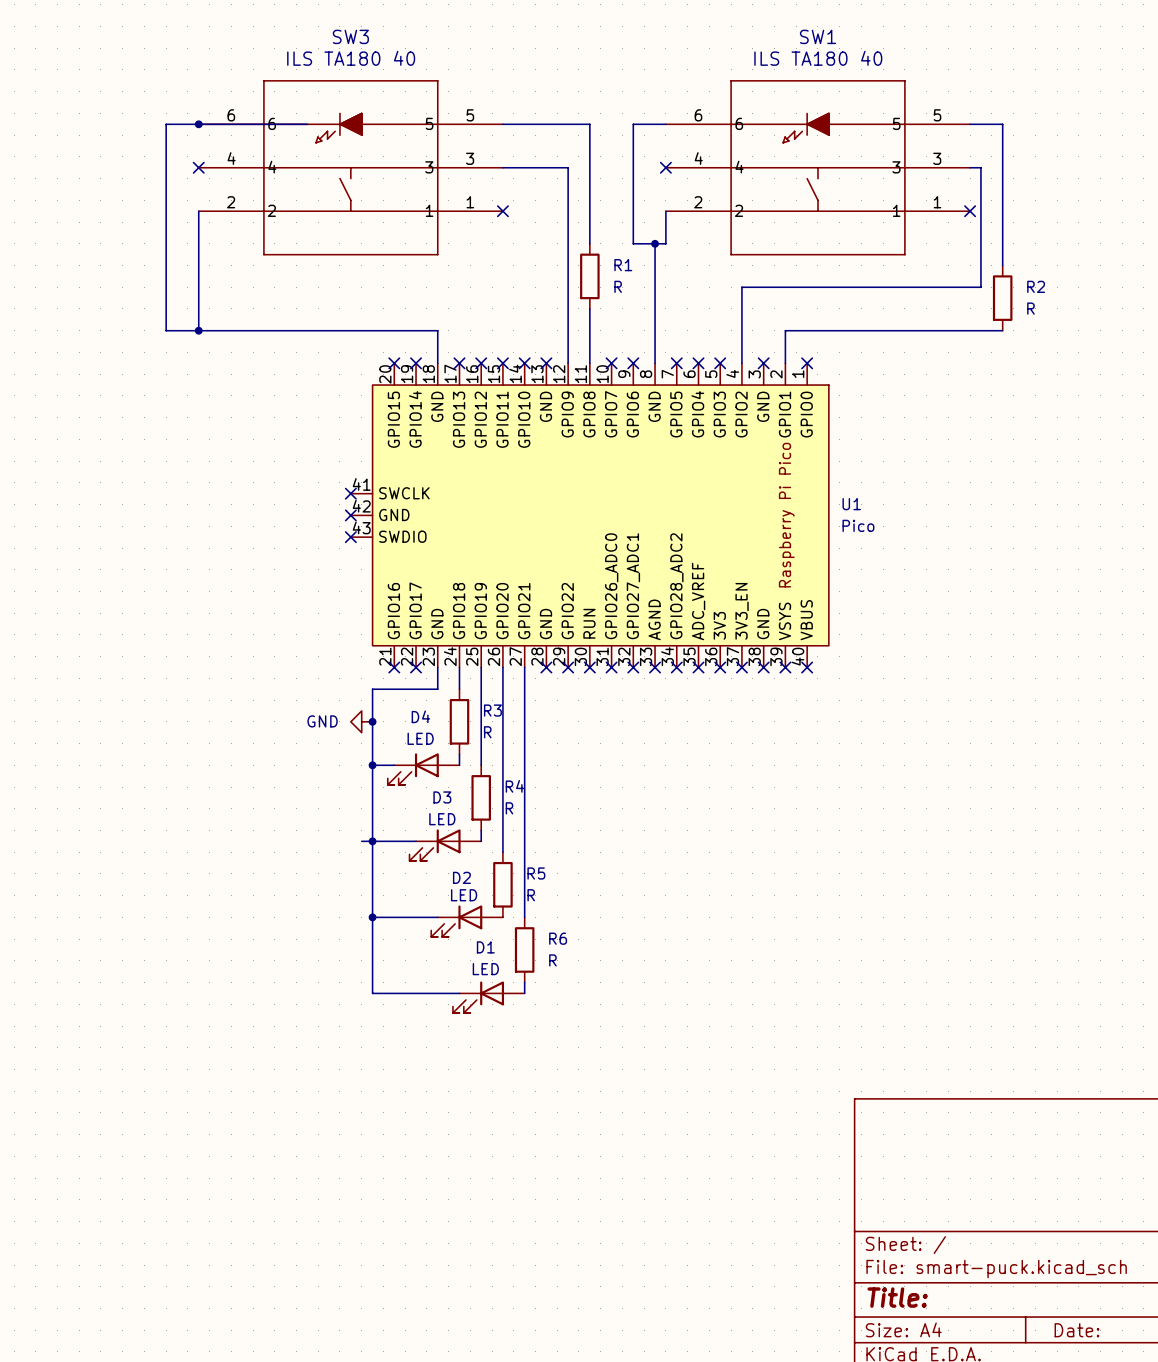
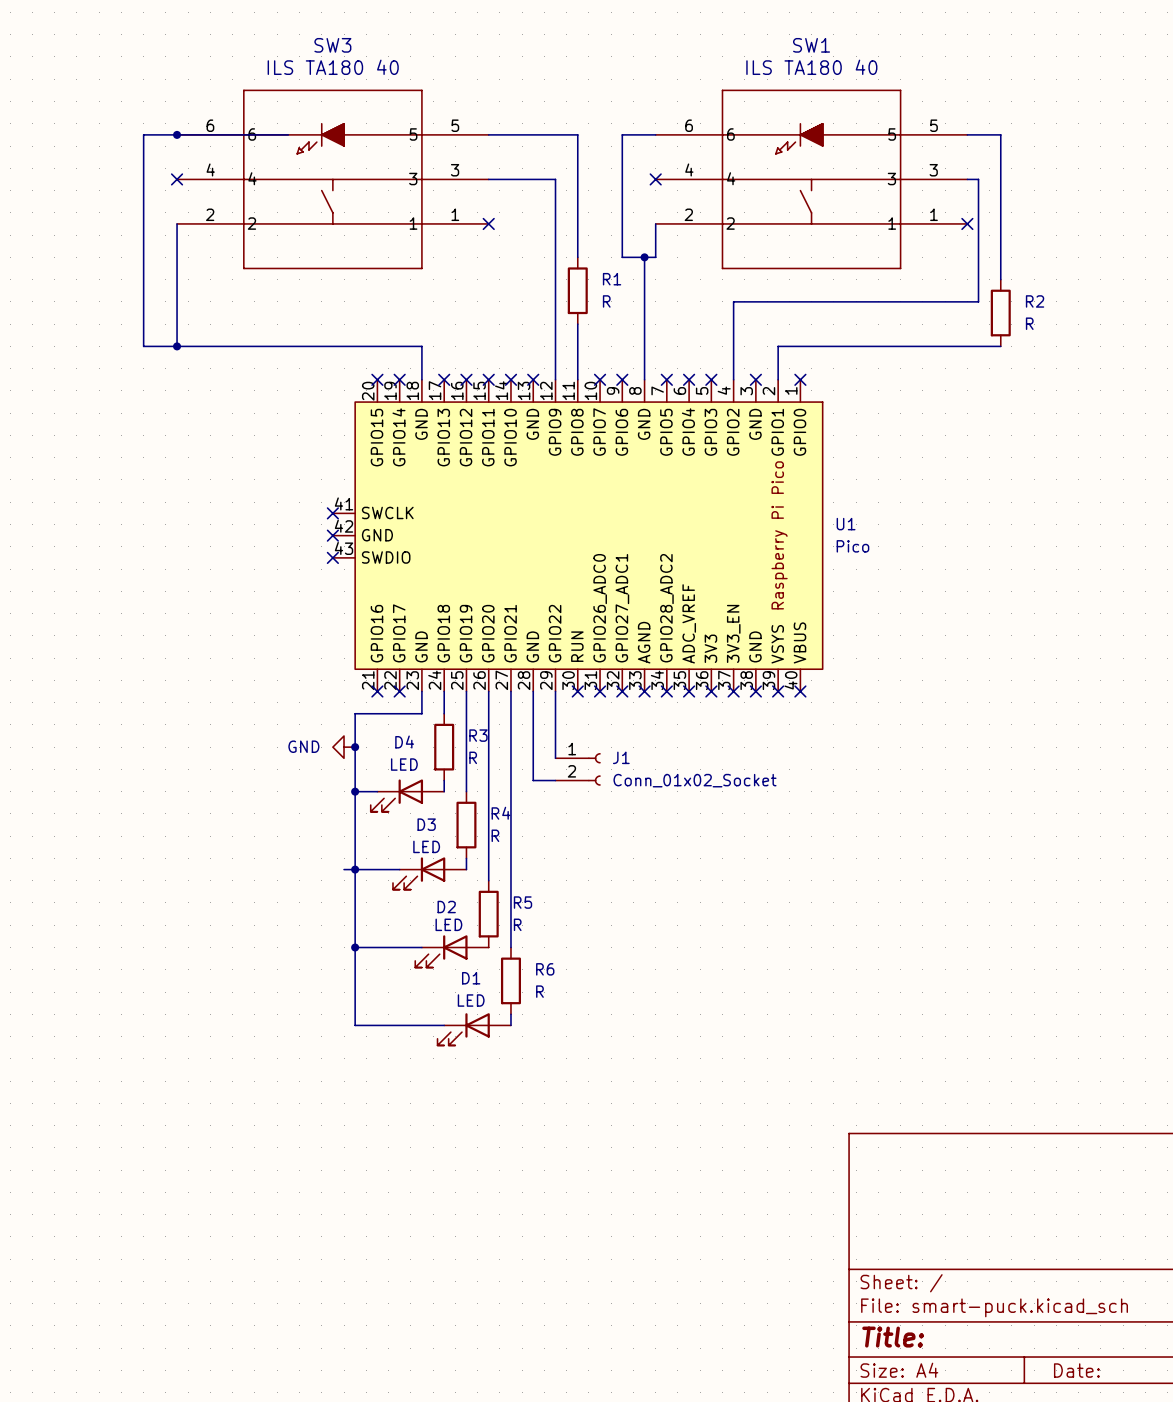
wire: none -> (533, 691) (533, 780) (555, 780)
no-connect mark: (546, 667) -> none
wire: none -> (555, 691) (555, 758)
no-connect mark: (568, 667) -> none
J1: none -> Conn_01x02_Socket (578, 769)

